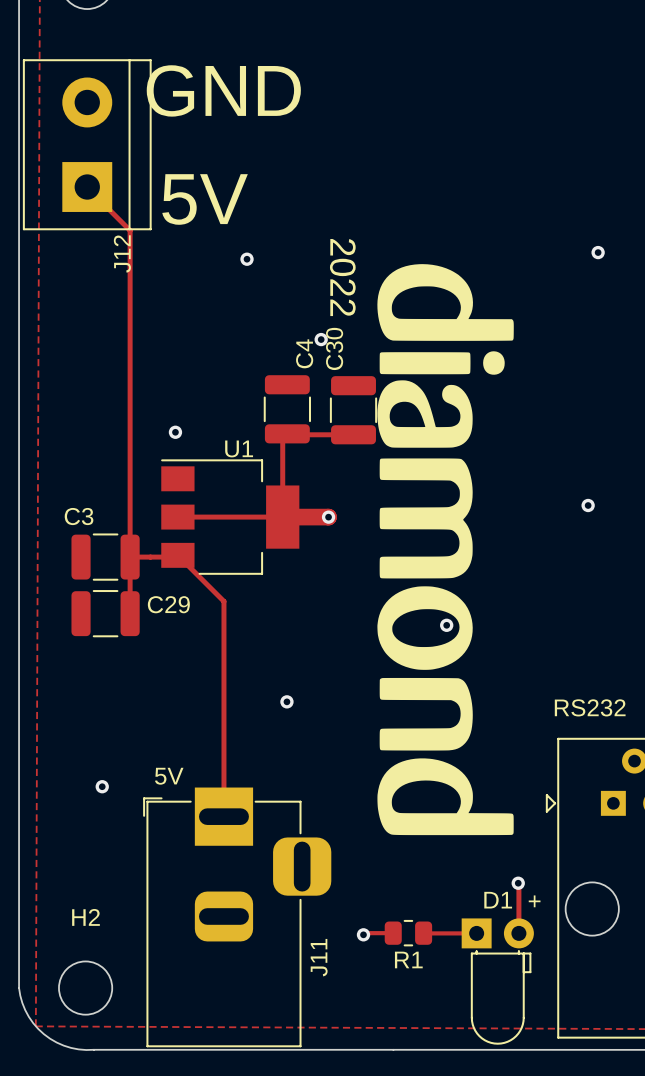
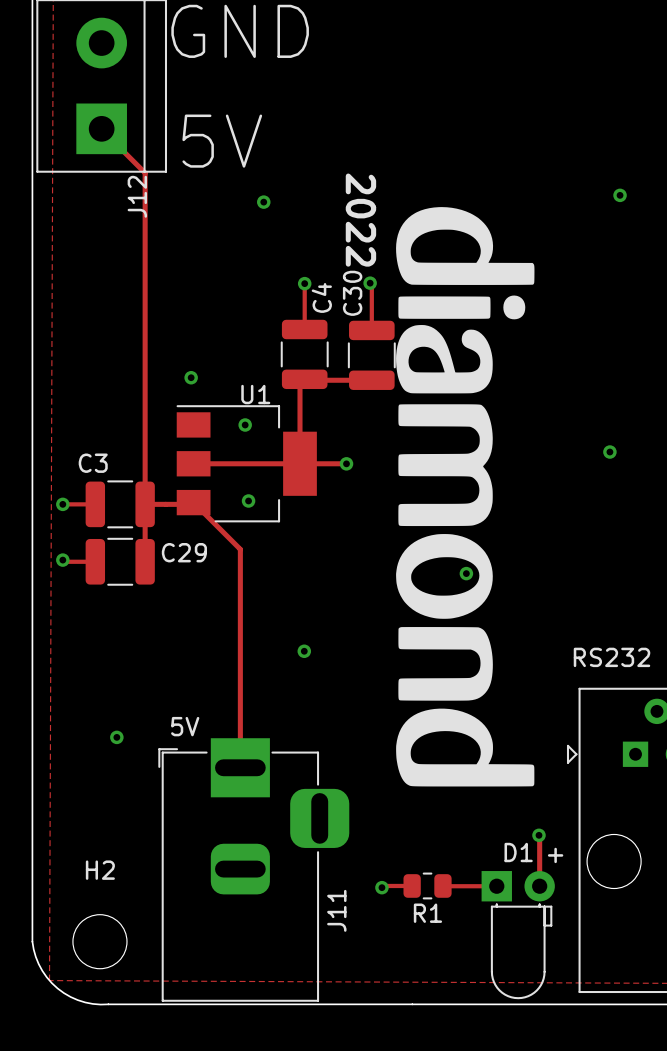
track: none -> (304, 283) (304, 329)
via: none -> (304, 283)
via: (321, 339) -> none
track: none -> (370, 283) (371, 284) (371, 330)
via: none -> (370, 283)
via: none -> (245, 425)
track width: thick (282, 517) (328, 517) -> thin (299, 463) (346, 463)
via: none -> (248, 500)
track: none -> (62, 504) (95, 504)
via: none -> (62, 504)
track: none -> (62, 560) (64, 561) (95, 561)
via: none -> (62, 560)

